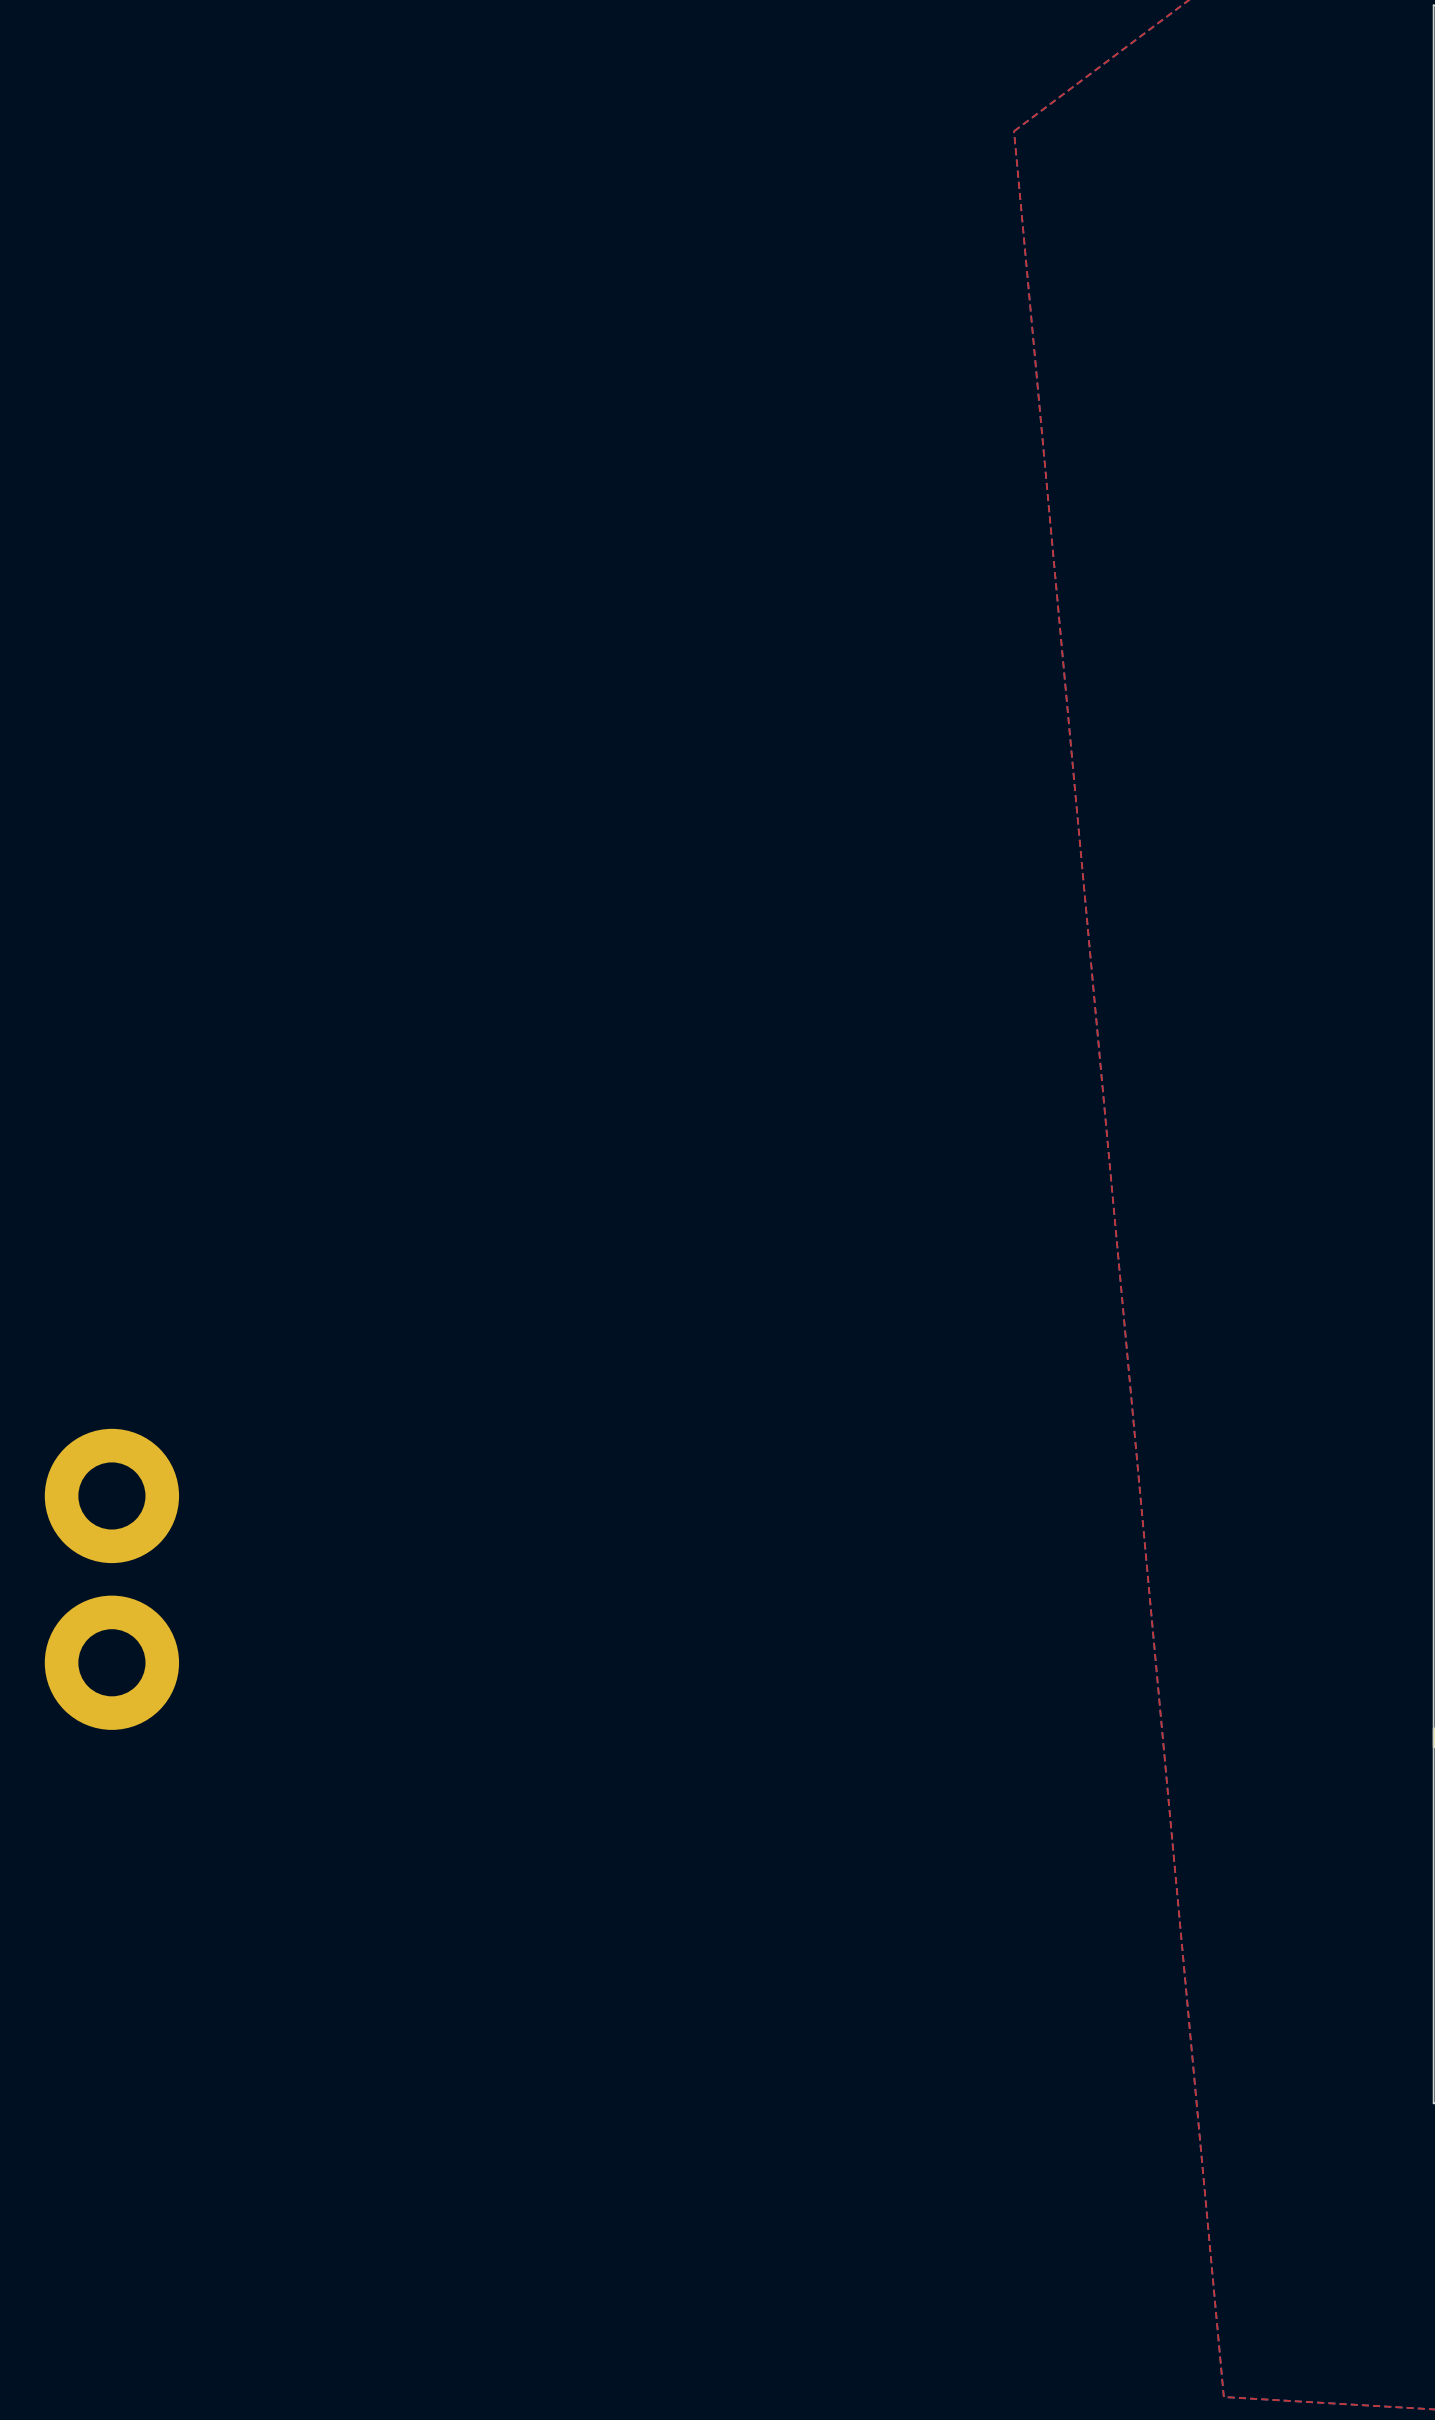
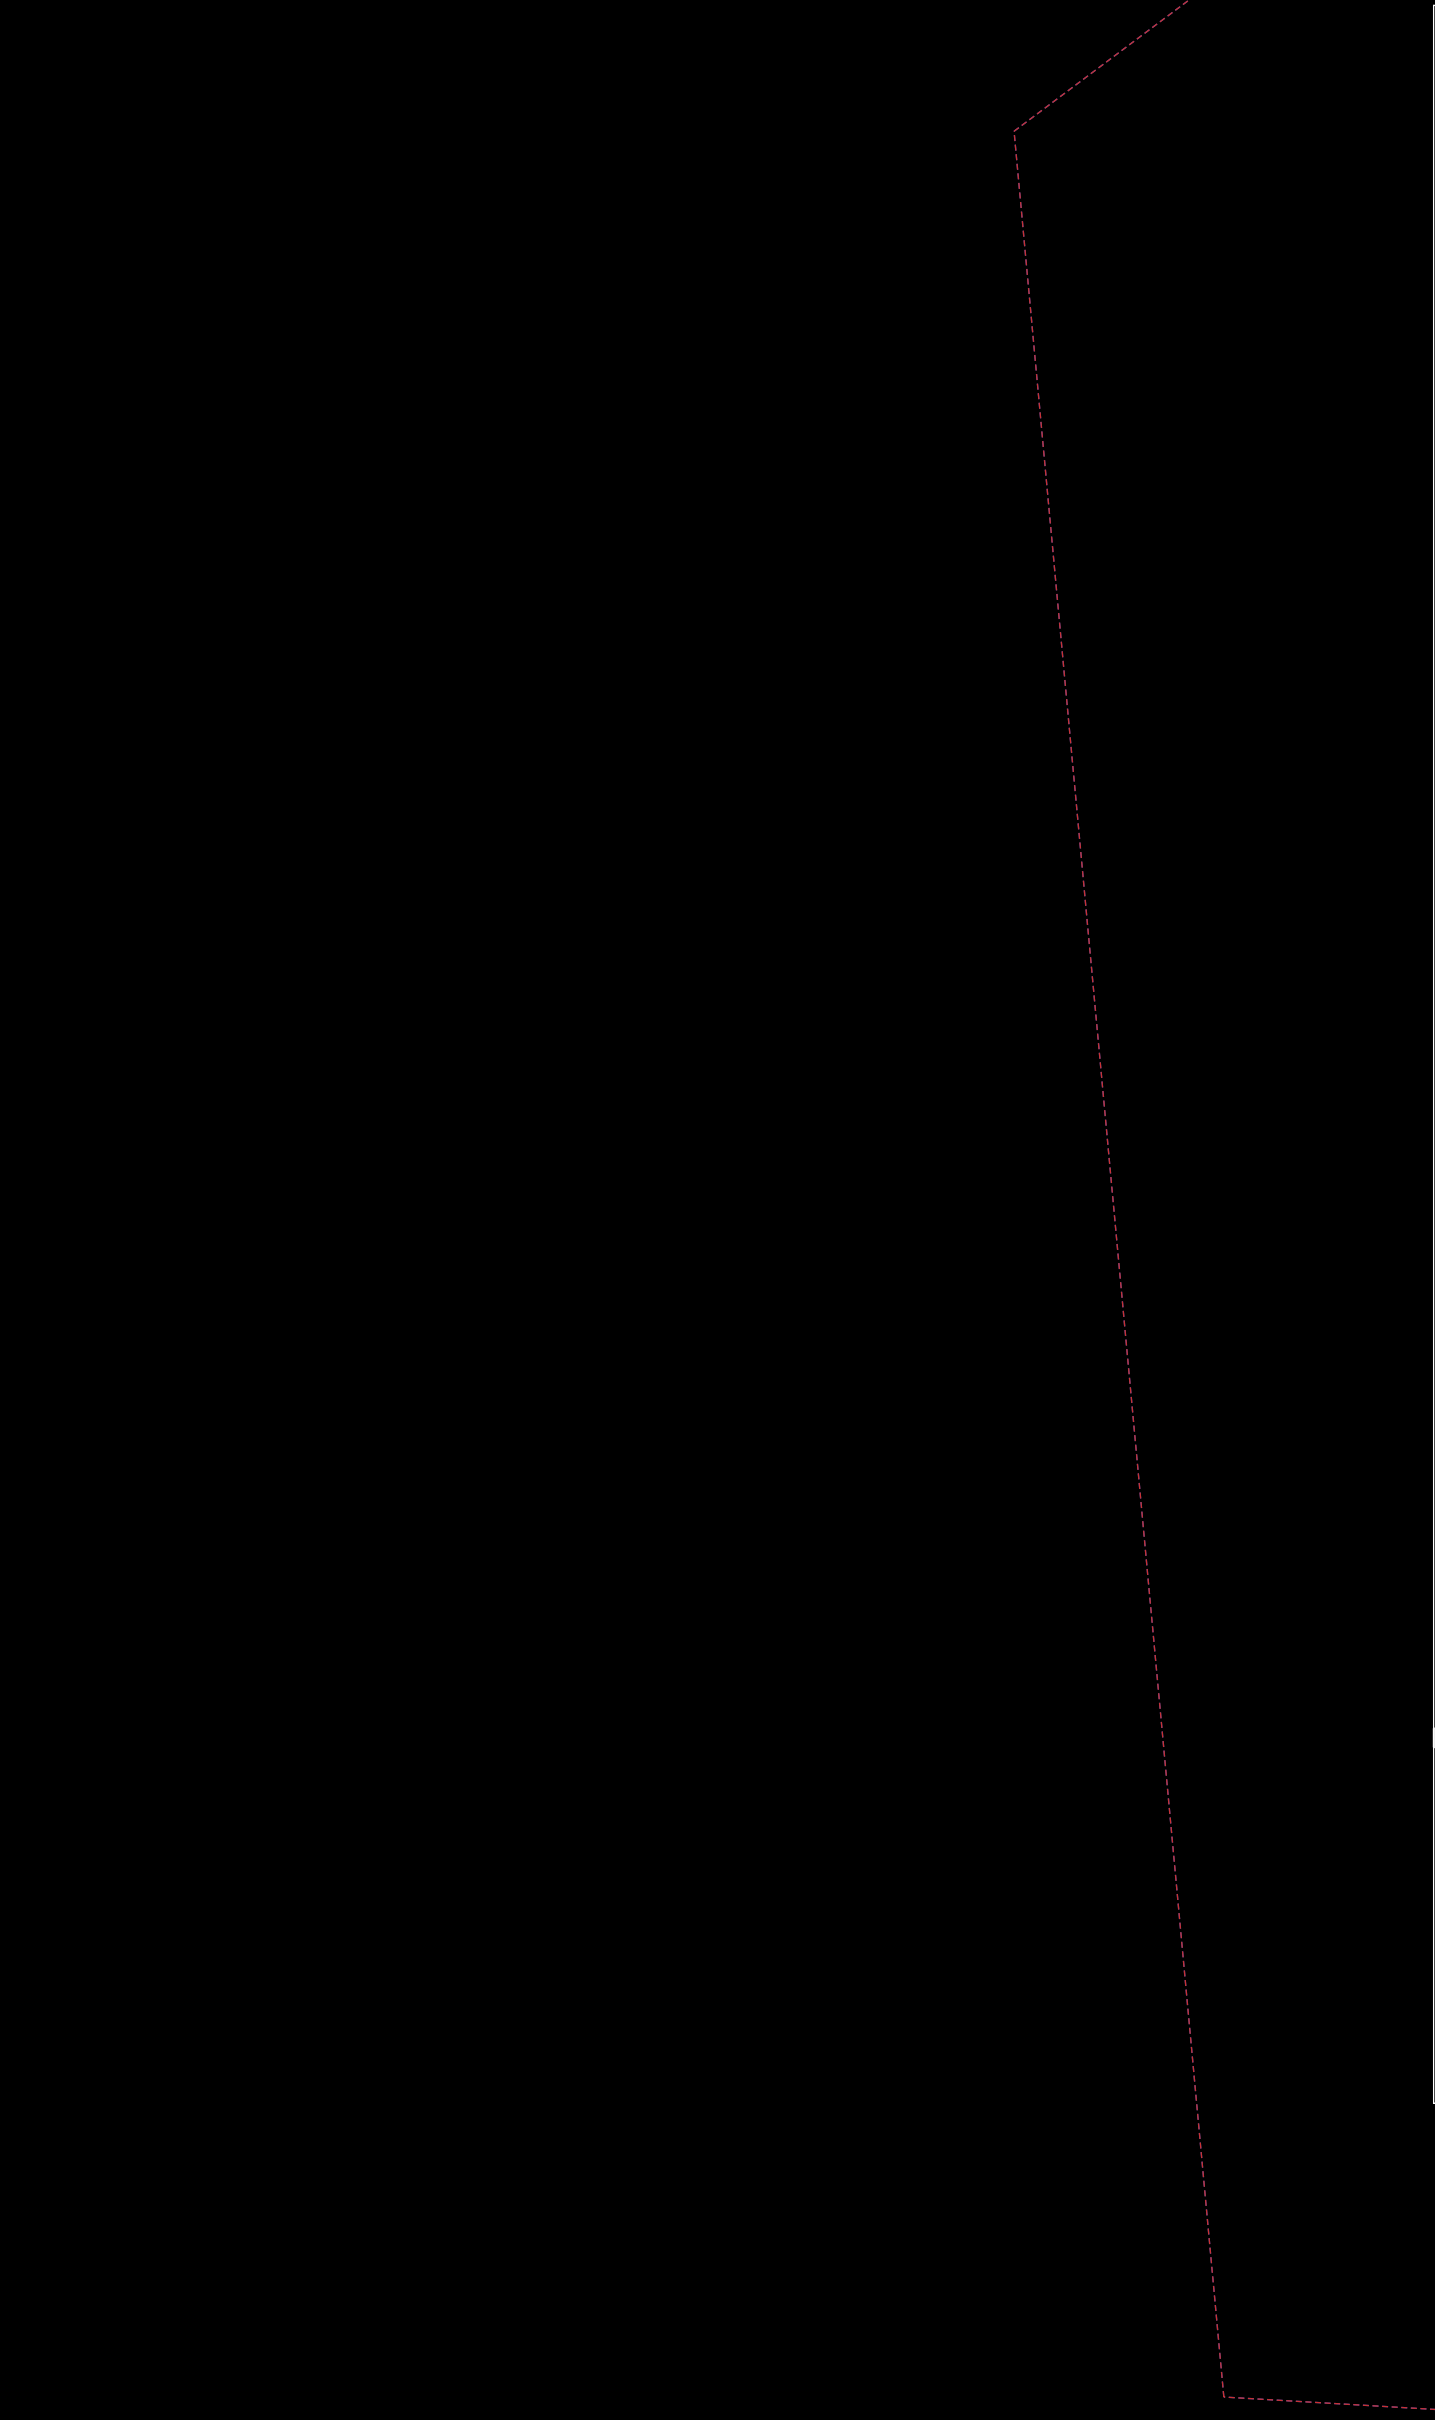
part: (111, 1495) -> none
part: (111, 1662) -> none

